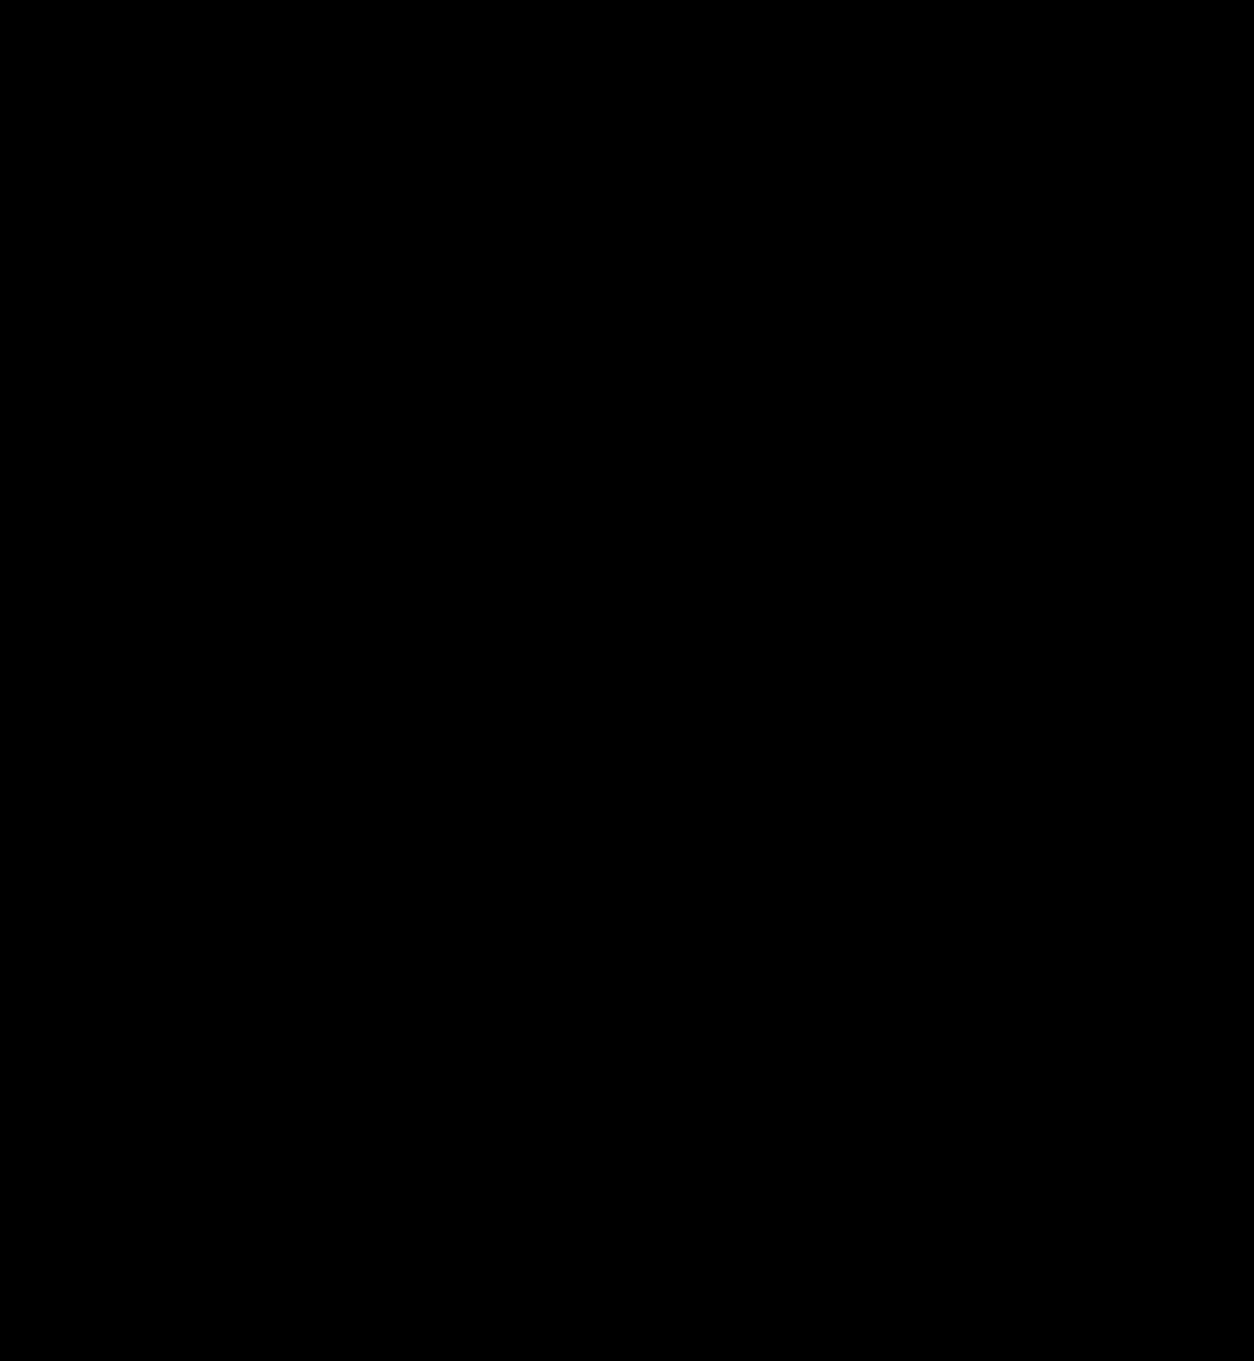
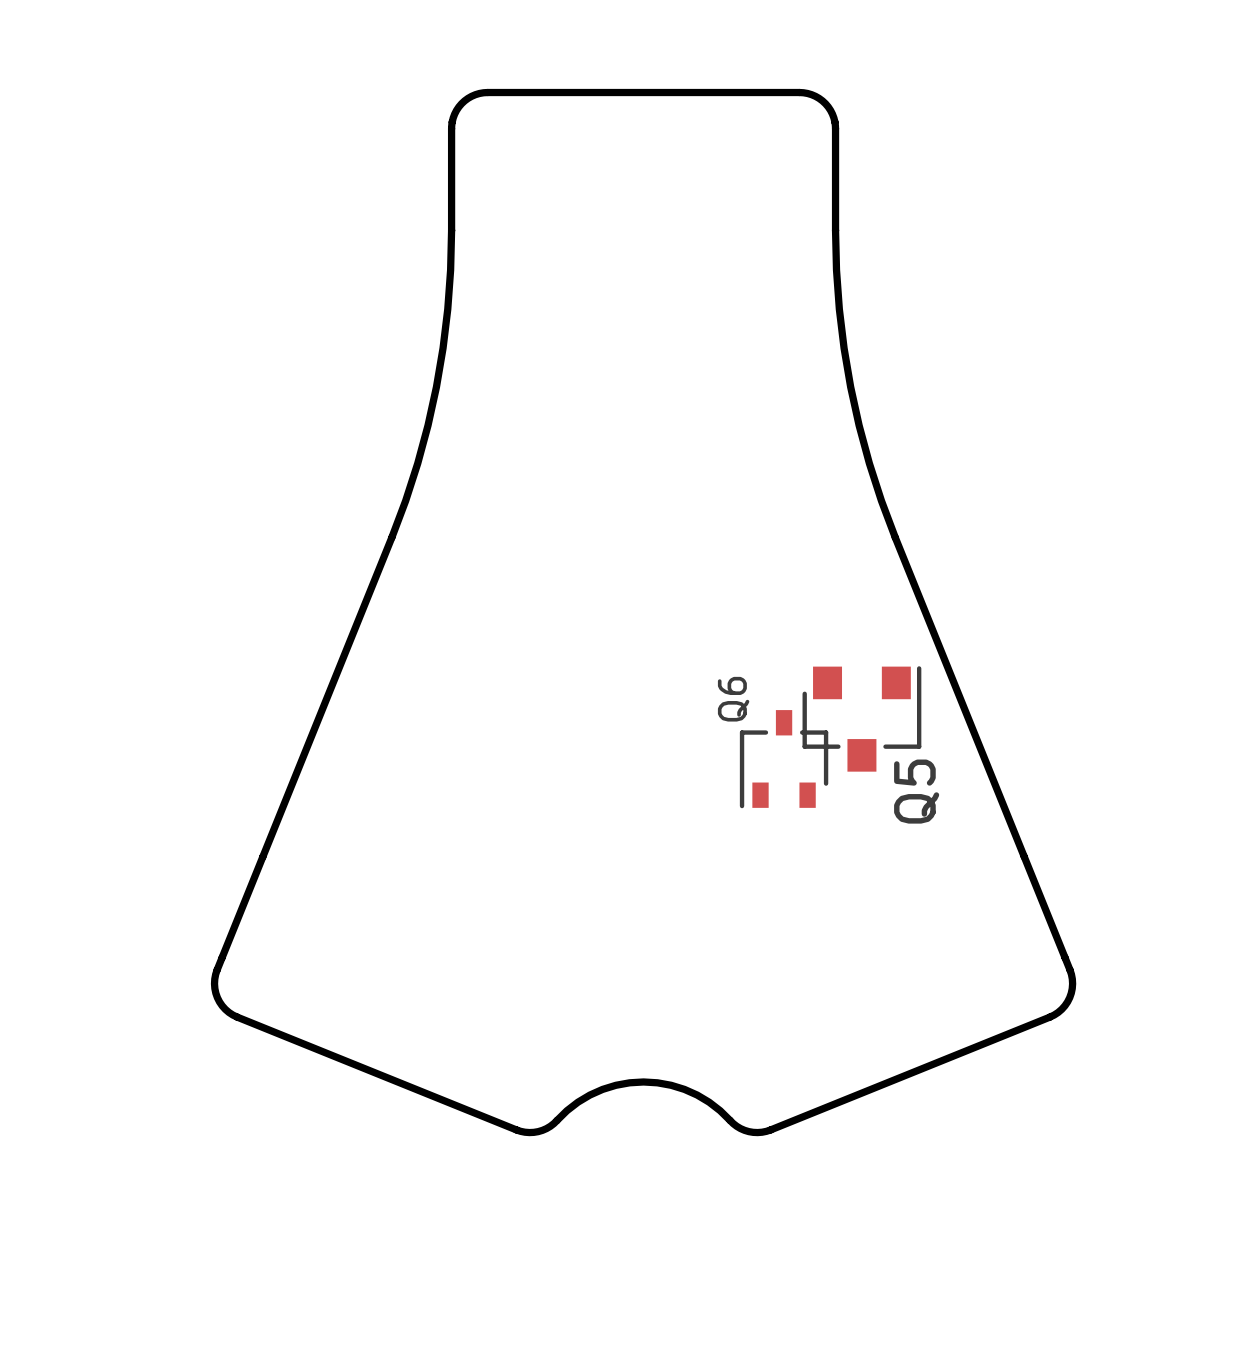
board edge: none -> (451, 230) (453, 118) (464, 100) (475, 94) (487, 92) (799, 92) (811, 94) (828, 106) (834, 122) (835, 230)
board edge: none -> (451, 230) (447, 309) (443, 348) (436, 387) (417, 463) (391, 537) (217, 969) (214, 988) (222, 1005) (237, 1017) (516, 1129) (529, 1132) (546, 1128) (577, 1102) (602, 1089) (629, 1082) (643, 1081) (671, 1085) (684, 1089) (709, 1102) (740, 1128) (753, 1132) (766, 1131) (1049, 1017) (1061, 1009) (1071, 993) (1072, 983) (1069, 969) (895, 537) (869, 463) (859, 425) (844, 348) (836, 270) (835, 230)
Q5: none -> (861, 718)
Q6: none -> (784, 759)

